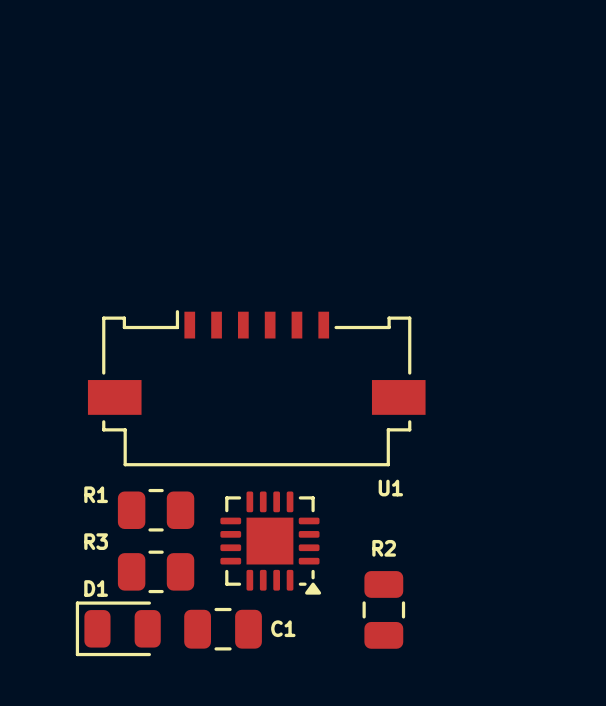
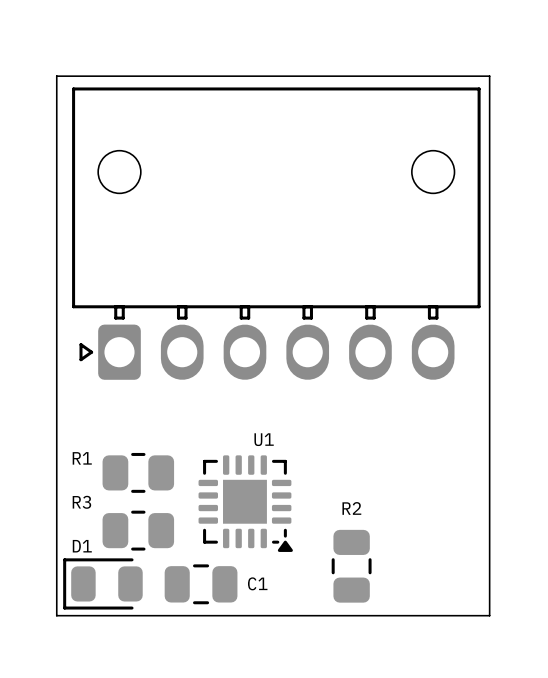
board edge: none -> (56, 76) (489, 76) (489, 615) (56, 615) (56, 76)
part: none -> (276, 233)
part: (256, 388) -> none
U1 name position: U1 (390, 488) -> U1 (264, 439)

